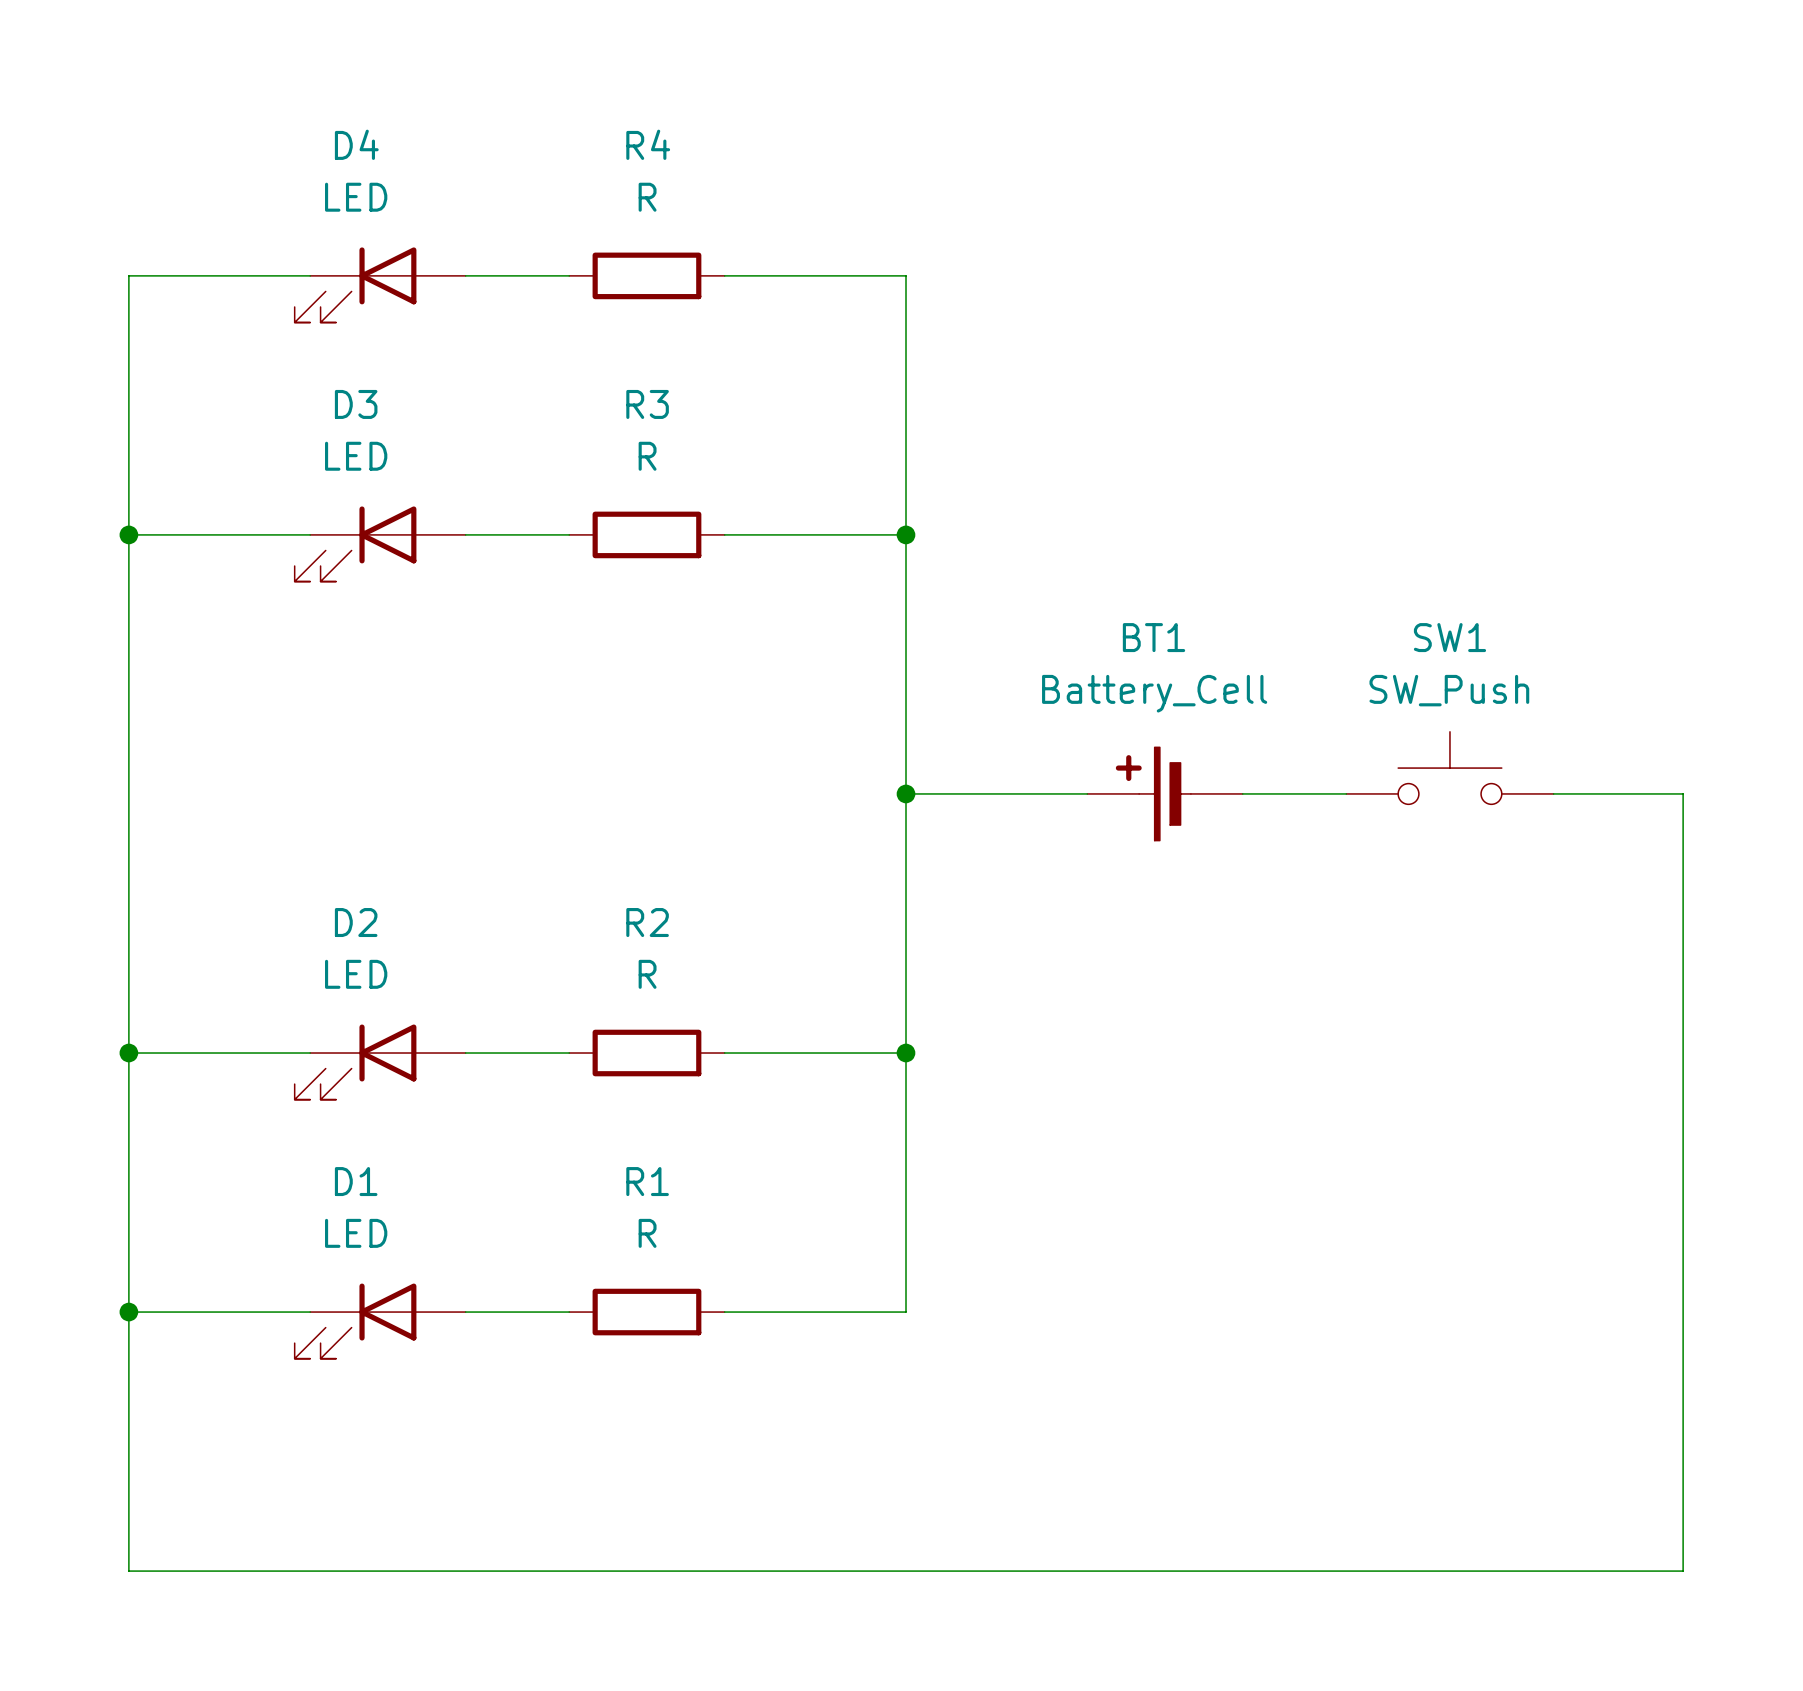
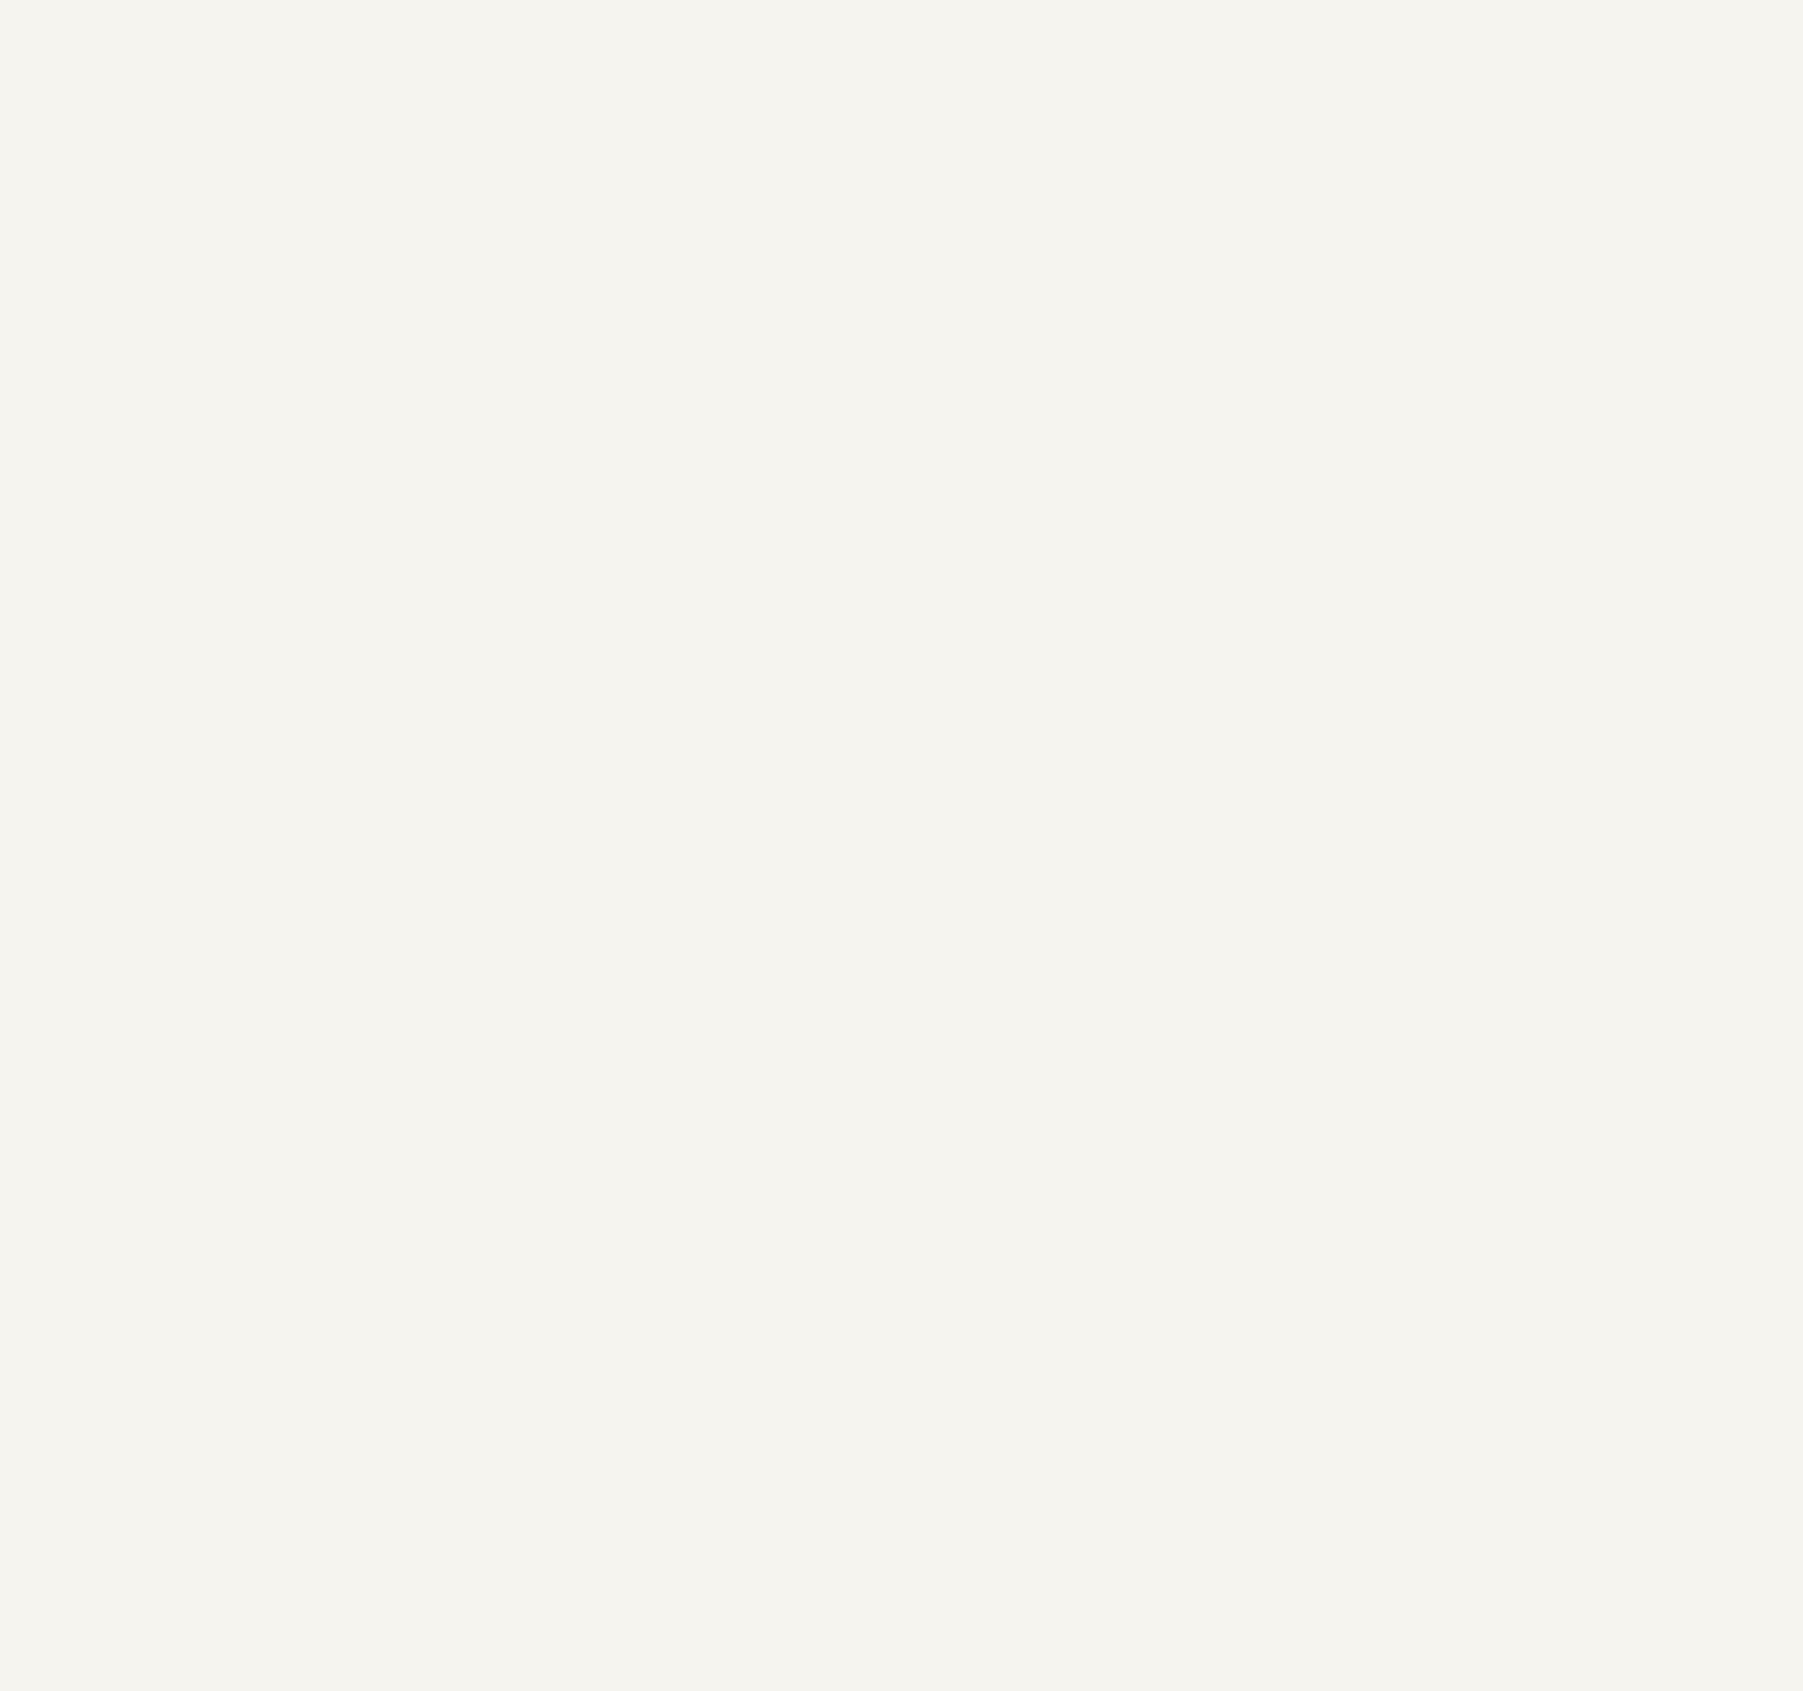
wire: (310, 275) (128, 275) (128, 1571) (1683, 1571) (1683, 793) (1553, 793) -> none
wire: (465, 275) (569, 275) -> none
R4: R (646, 275) -> none
wire: (724, 275) (906, 275) (906, 1312) (724, 1312) -> none
D4: LED (380, 284) -> none
wire: (128, 534) (310, 534) -> none
junction: (128, 534) -> none
wire: (465, 534) (569, 534) -> none
R3: R (646, 534) -> none
wire: (724, 534) (906, 534) -> none
junction: (906, 534) -> none
D3: LED (380, 544) -> none
SW1: SW_Push (1449, 768) -> none
wire: (906, 793) (1087, 793) -> none
junction: (906, 793) -> none
BT1: Battery_Cell (1165, 793) -> none
wire: (1242, 793) (1346, 793) -> none
wire: (128, 1053) (310, 1053) -> none
junction: (128, 1053) -> none
wire: (465, 1053) (569, 1053) -> none
R2: R (646, 1053) -> none
wire: (724, 1053) (906, 1053) -> none
junction: (906, 1053) -> none
D2: LED (380, 1062) -> none
wire: (128, 1312) (310, 1312) -> none
junction: (128, 1312) -> none
wire: (465, 1312) (569, 1312) -> none
R1: R (646, 1312) -> none
D1: LED (380, 1321) -> none

